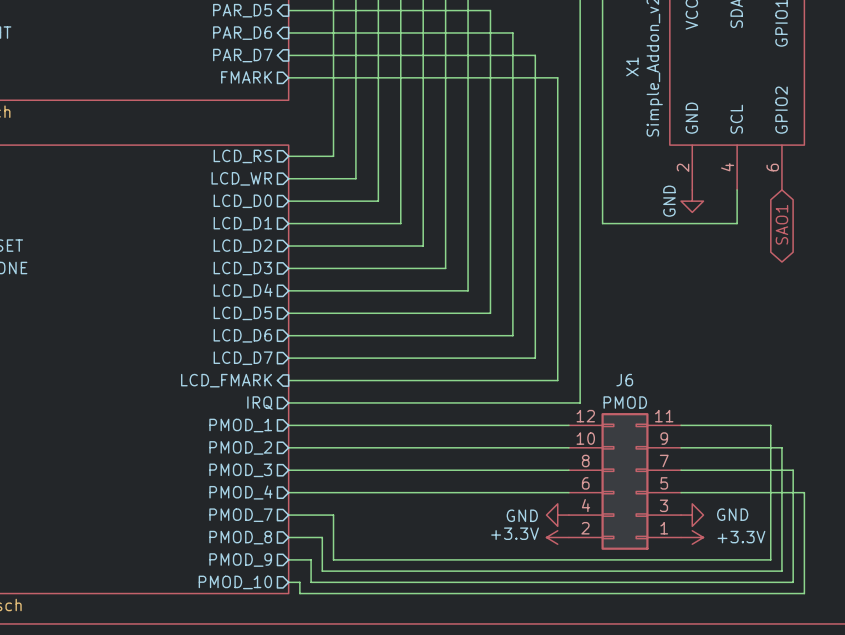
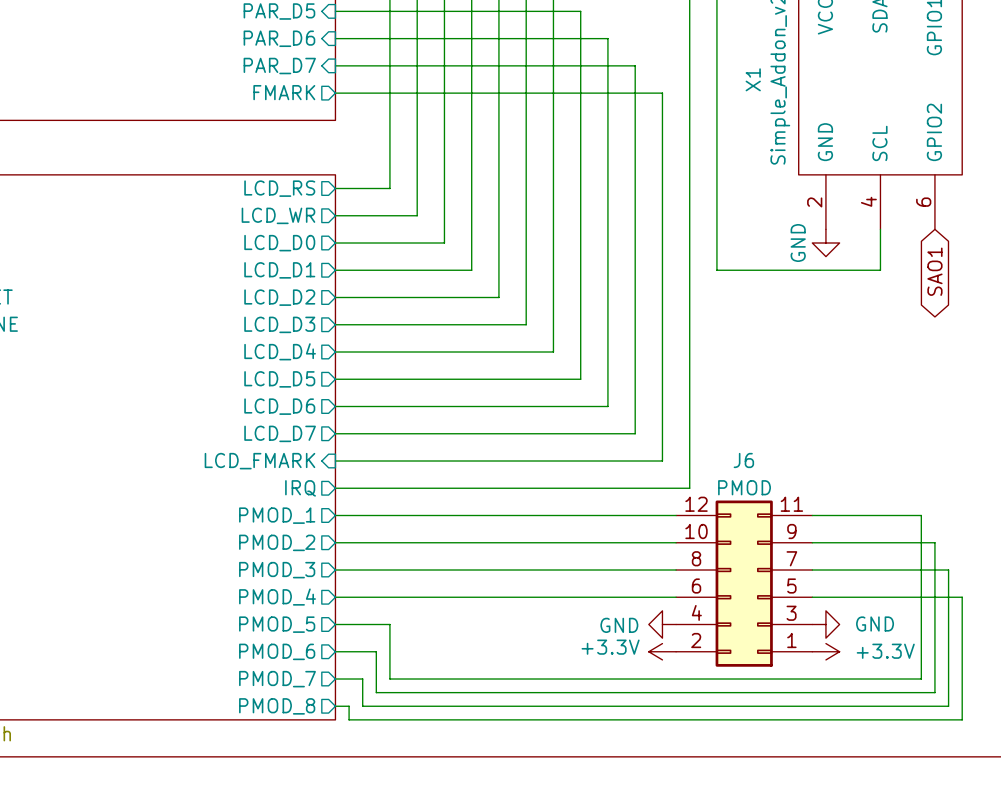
sheet pin: PMOD_7 (240, 515) -> PMOD_5 (277, 624)
sheet pin: PMOD_8 (240, 537) -> PMOD_6 (277, 651)
sheet pin: PMOD_9 (240, 560) -> PMOD_7 (277, 679)
sheet pin: PMOD_10 (235, 582) -> PMOD_8 (277, 706)

